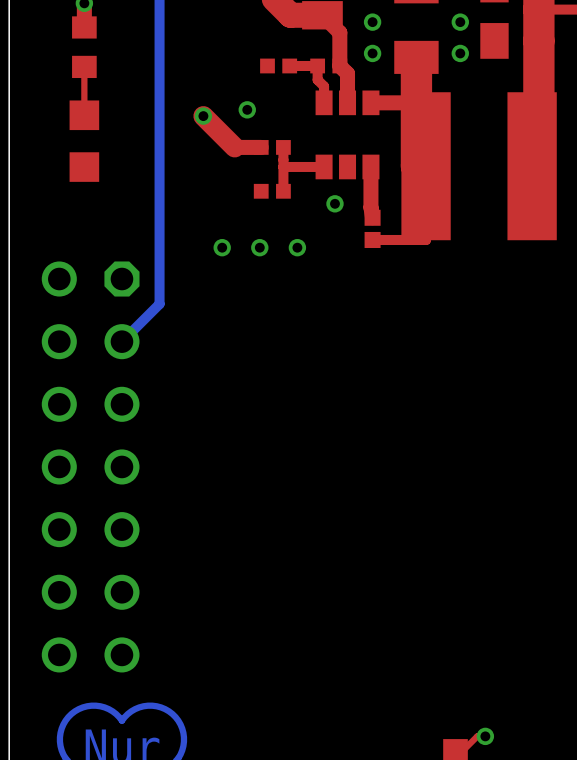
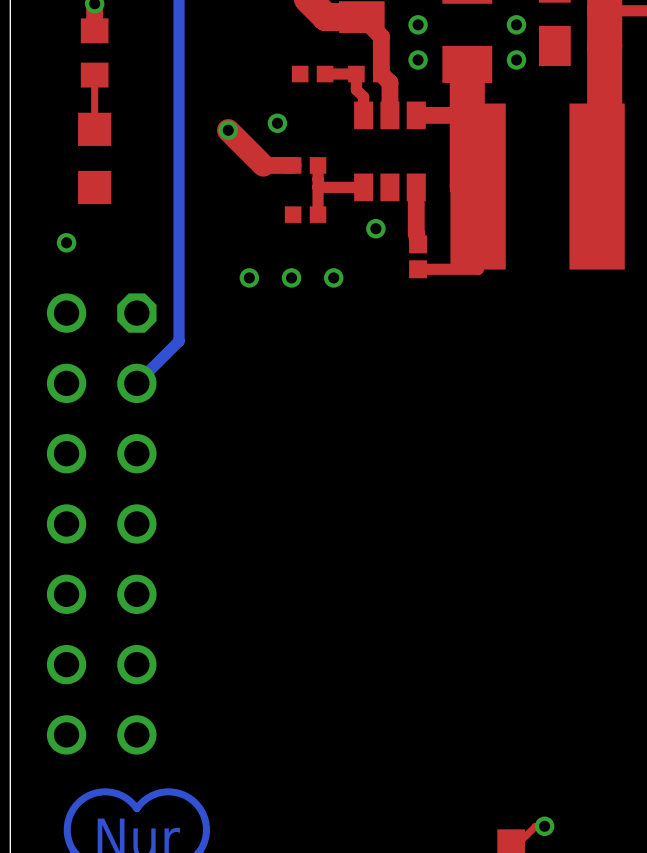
via: none -> (66, 242)

